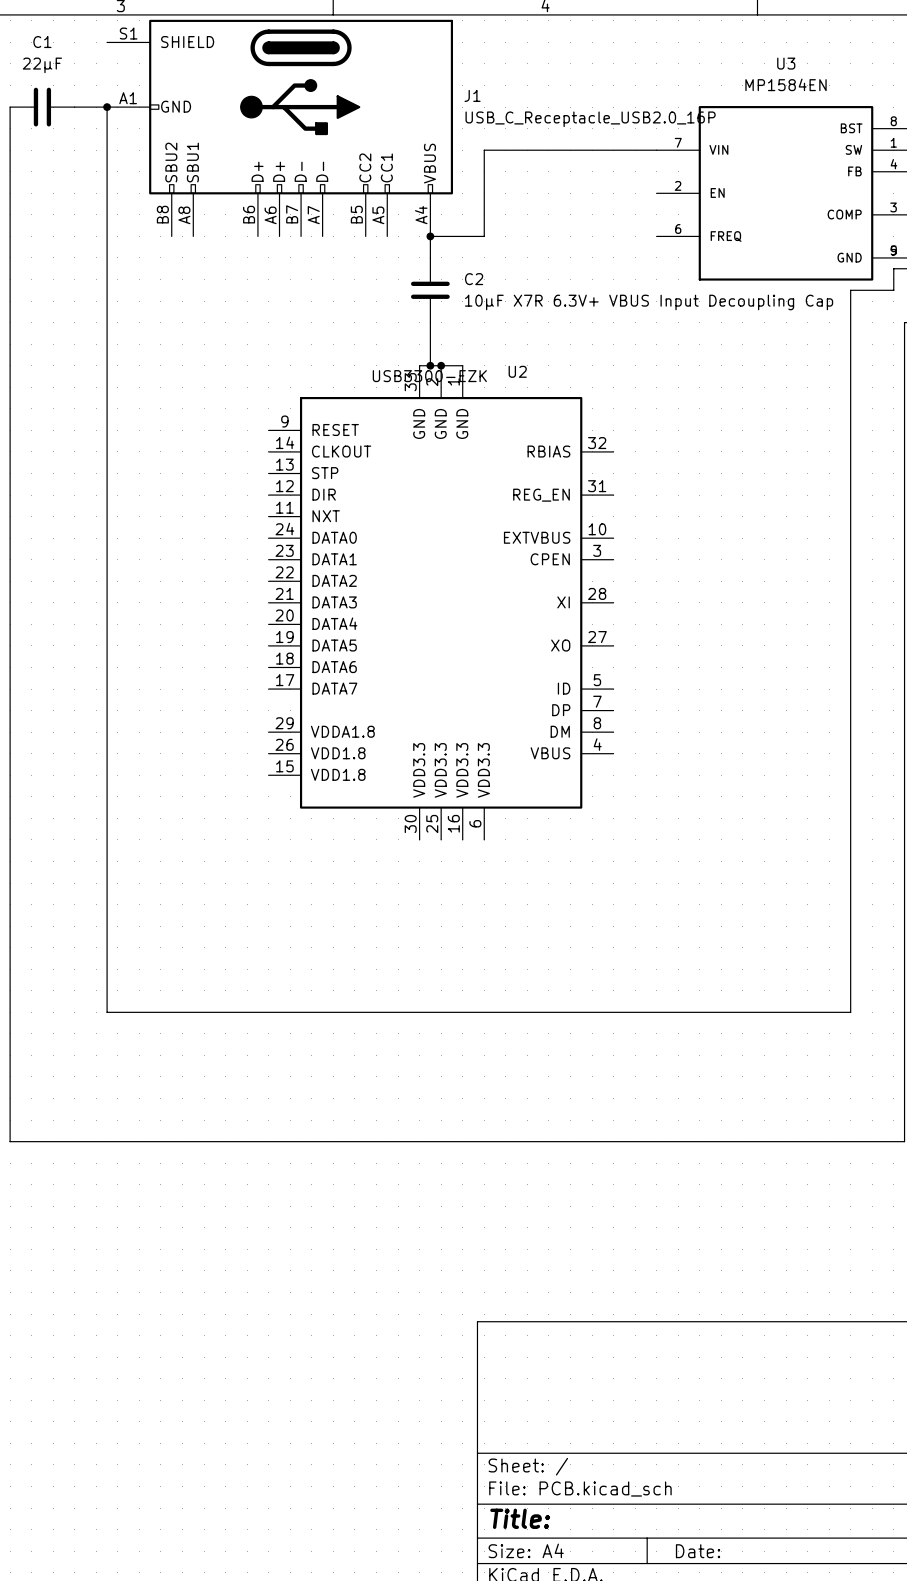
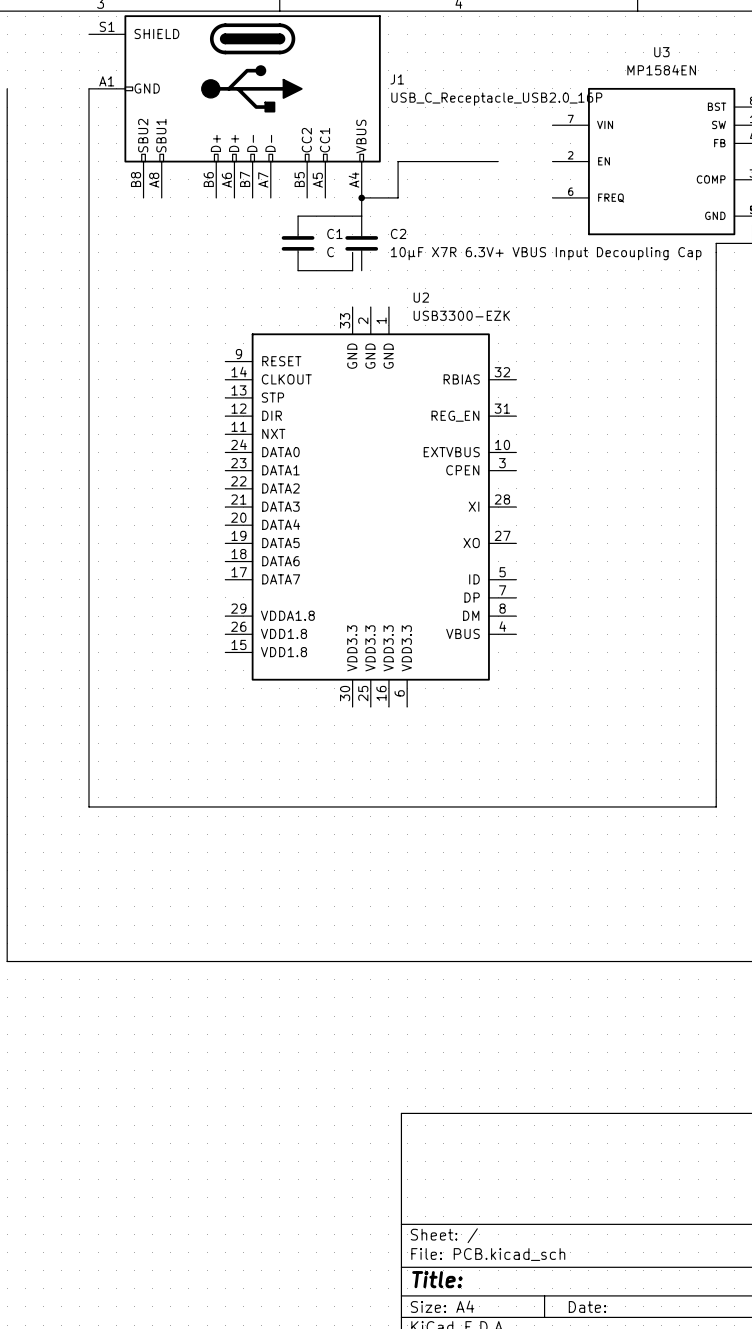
C1 name position: C1 (42, 42) -> C1 (334, 233)
C1 value: 22µF (42, 65) -> C (330, 252)
C1 rotation: 0° (42, 107) -> 90° clockwise (298, 243)
C1 position: (42, 107) -> (298, 243)
wire: (74, 107) (107, 107) -> none
junction: (107, 107) -> none
wire: (656, 150) (484, 150) (484, 236) (473, 236) -> (498, 161) (398, 161) (398, 197)
wire: none -> (298, 216) (361, 216)
wire: none -> (352, 252) (352, 270) (298, 270)
wire: (430, 322) (430, 365) -> none
wire: (419, 365) (462, 365) -> none
junction: (430, 365) -> none
junction: (441, 365) -> none
U2 name position: U2 (517, 371) -> U2 (421, 297)
U2 value position: USB3300-EZK (429, 376) -> USB3300-EZK (461, 315)
wire: (107, 958) (107, 1012) (850, 1012) (850, 958) -> (88, 806) (716, 806)

